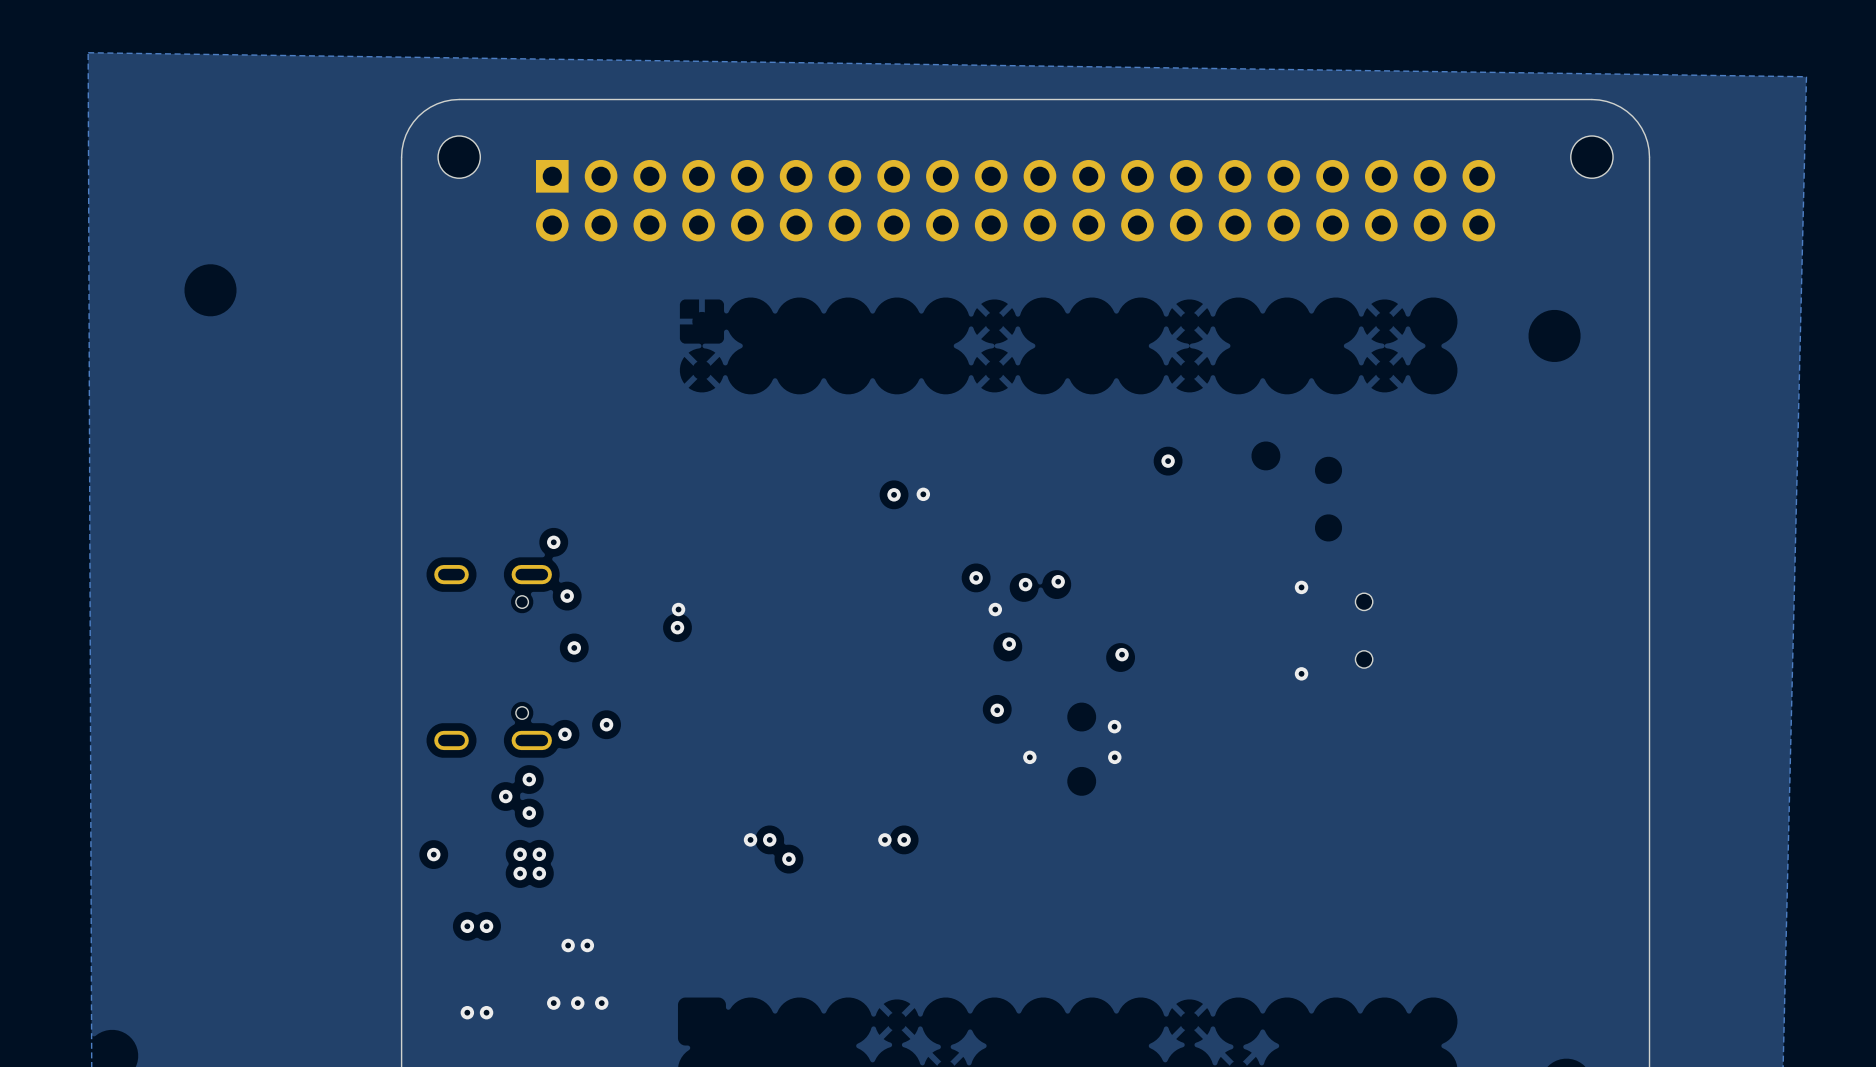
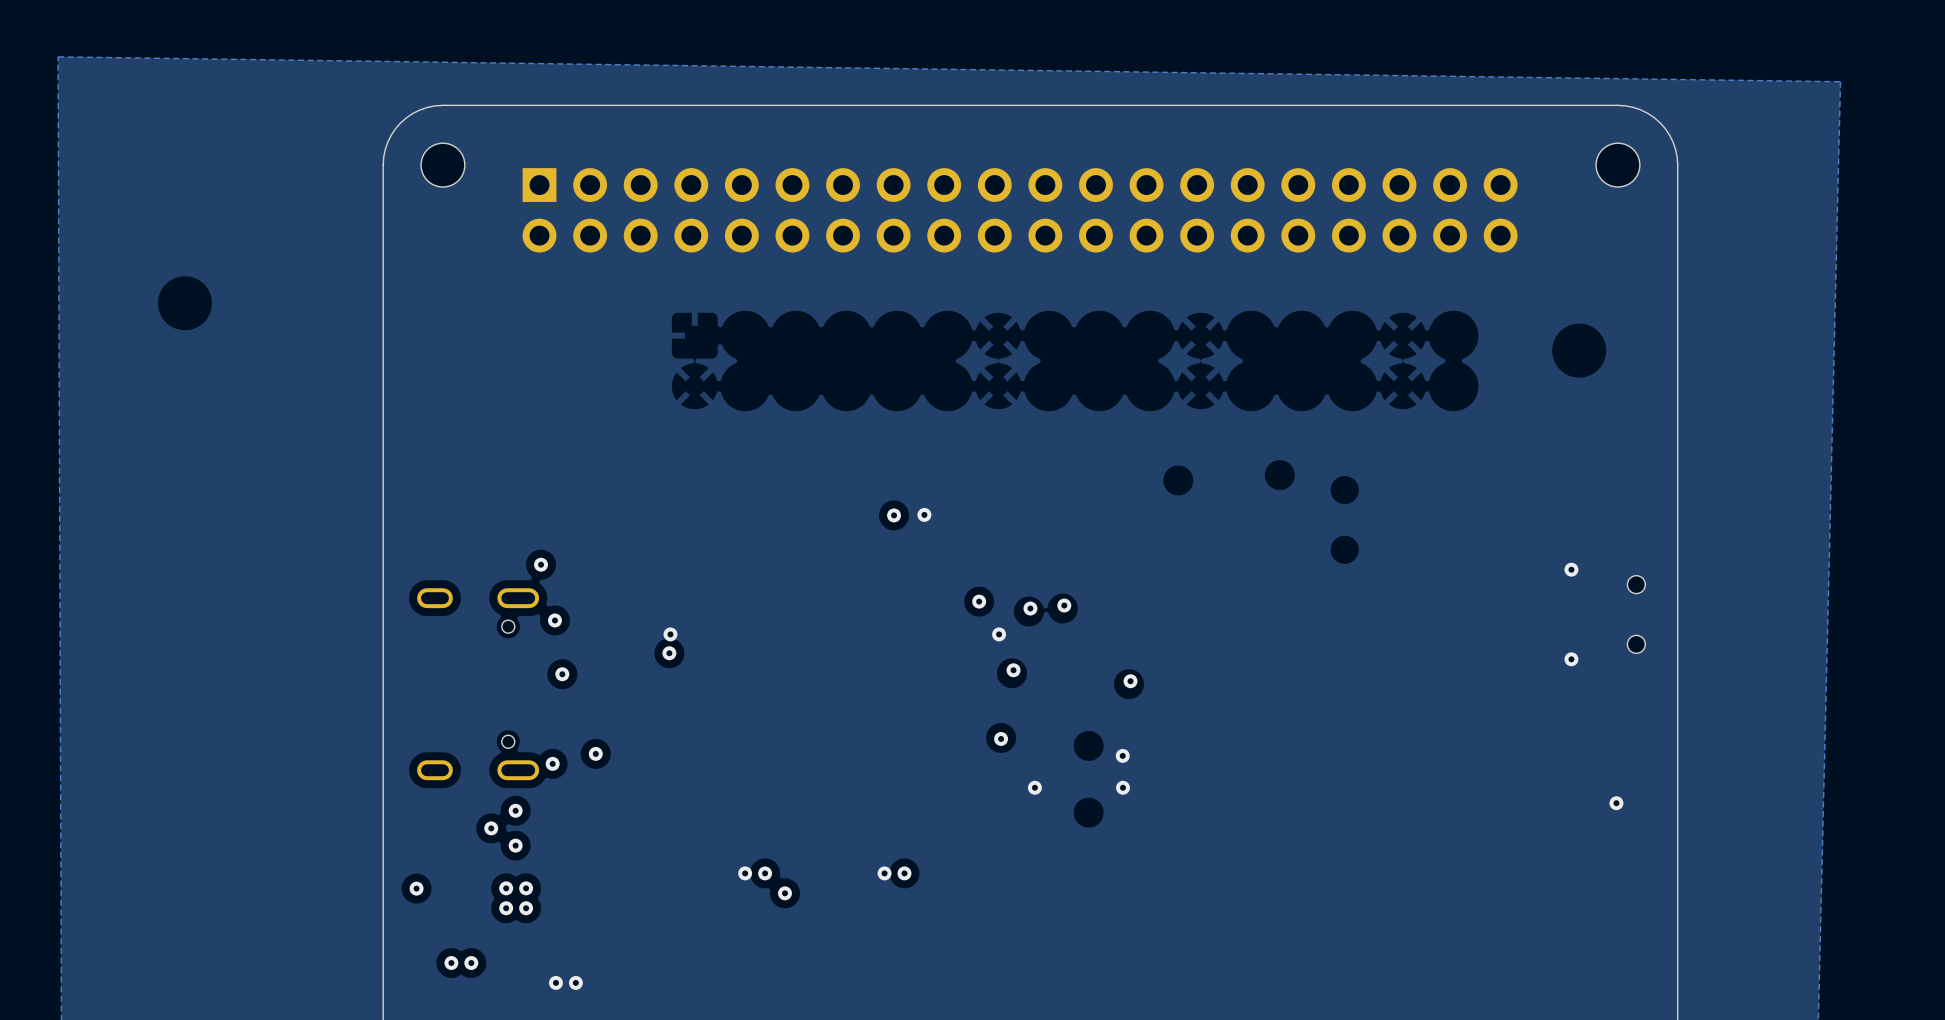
via: (1168, 461) -> none
via: none -> (1571, 569)
via: (1301, 587) -> none
part position: (1364, 630) -> (1636, 614)
via: none -> (1571, 659)
via: (1301, 673) -> none
via: none -> (1616, 803)

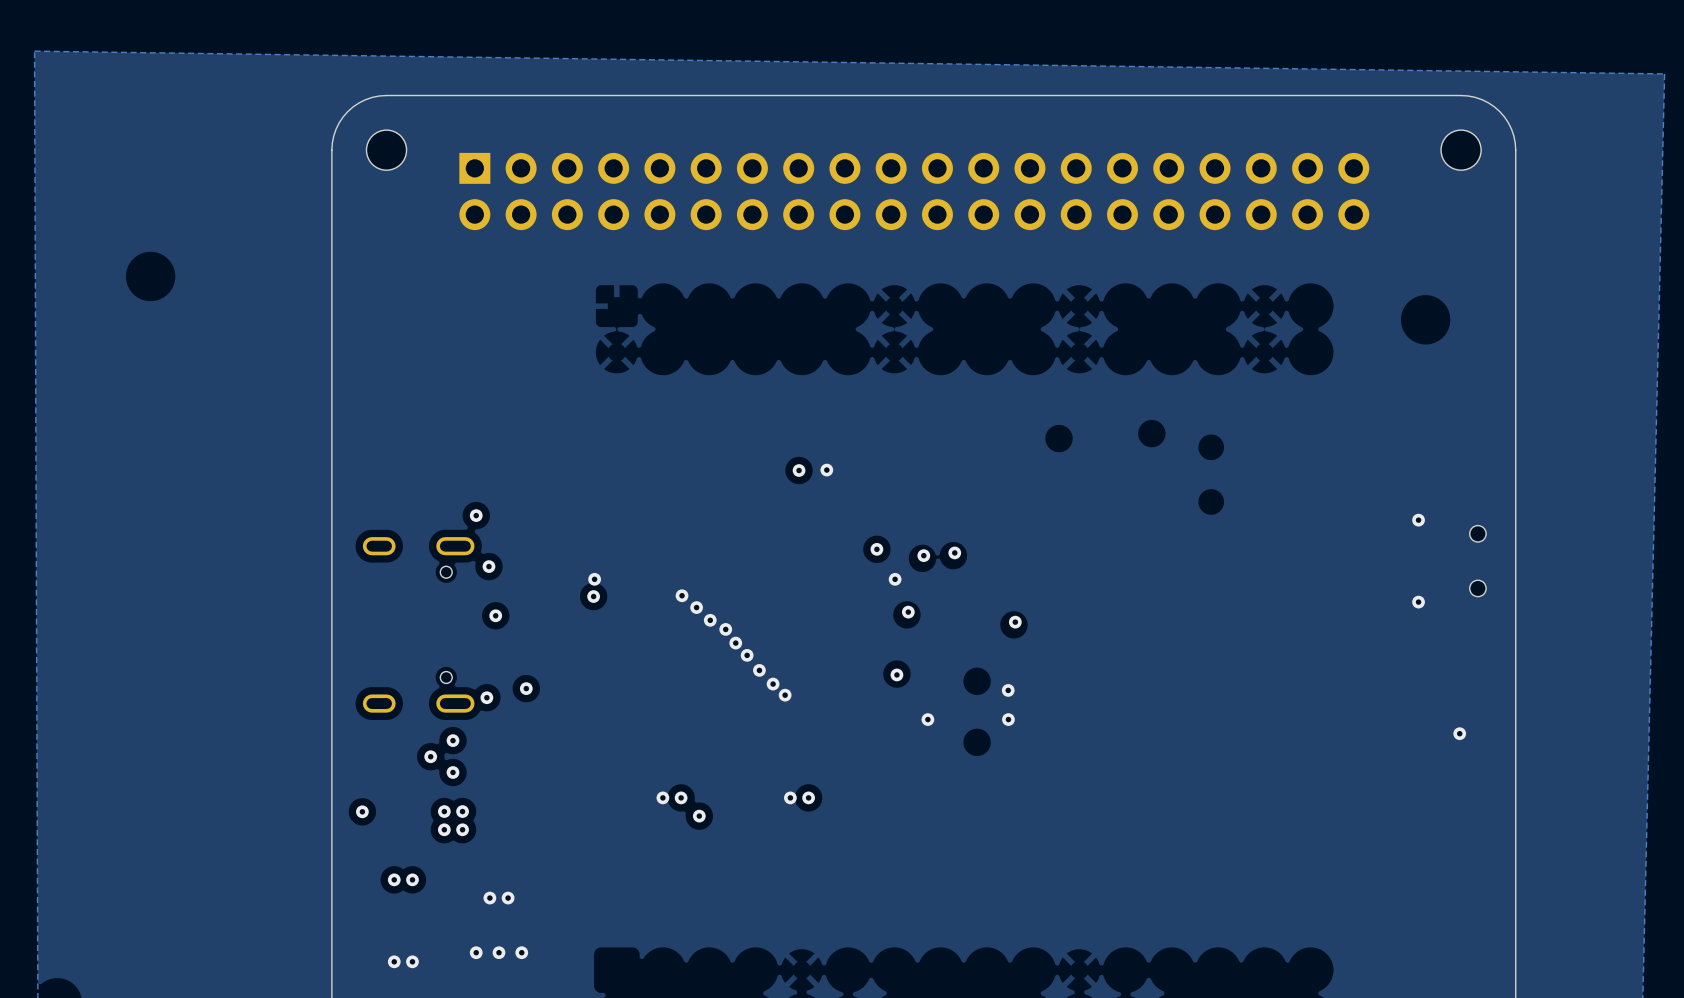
via: none -> (682, 595)
via: none -> (696, 607)
via: none -> (710, 620)
via: none -> (725, 629)
via: none -> (735, 643)
via: none -> (747, 655)
via: none -> (759, 670)
via: none -> (773, 684)
via: none -> (785, 695)

